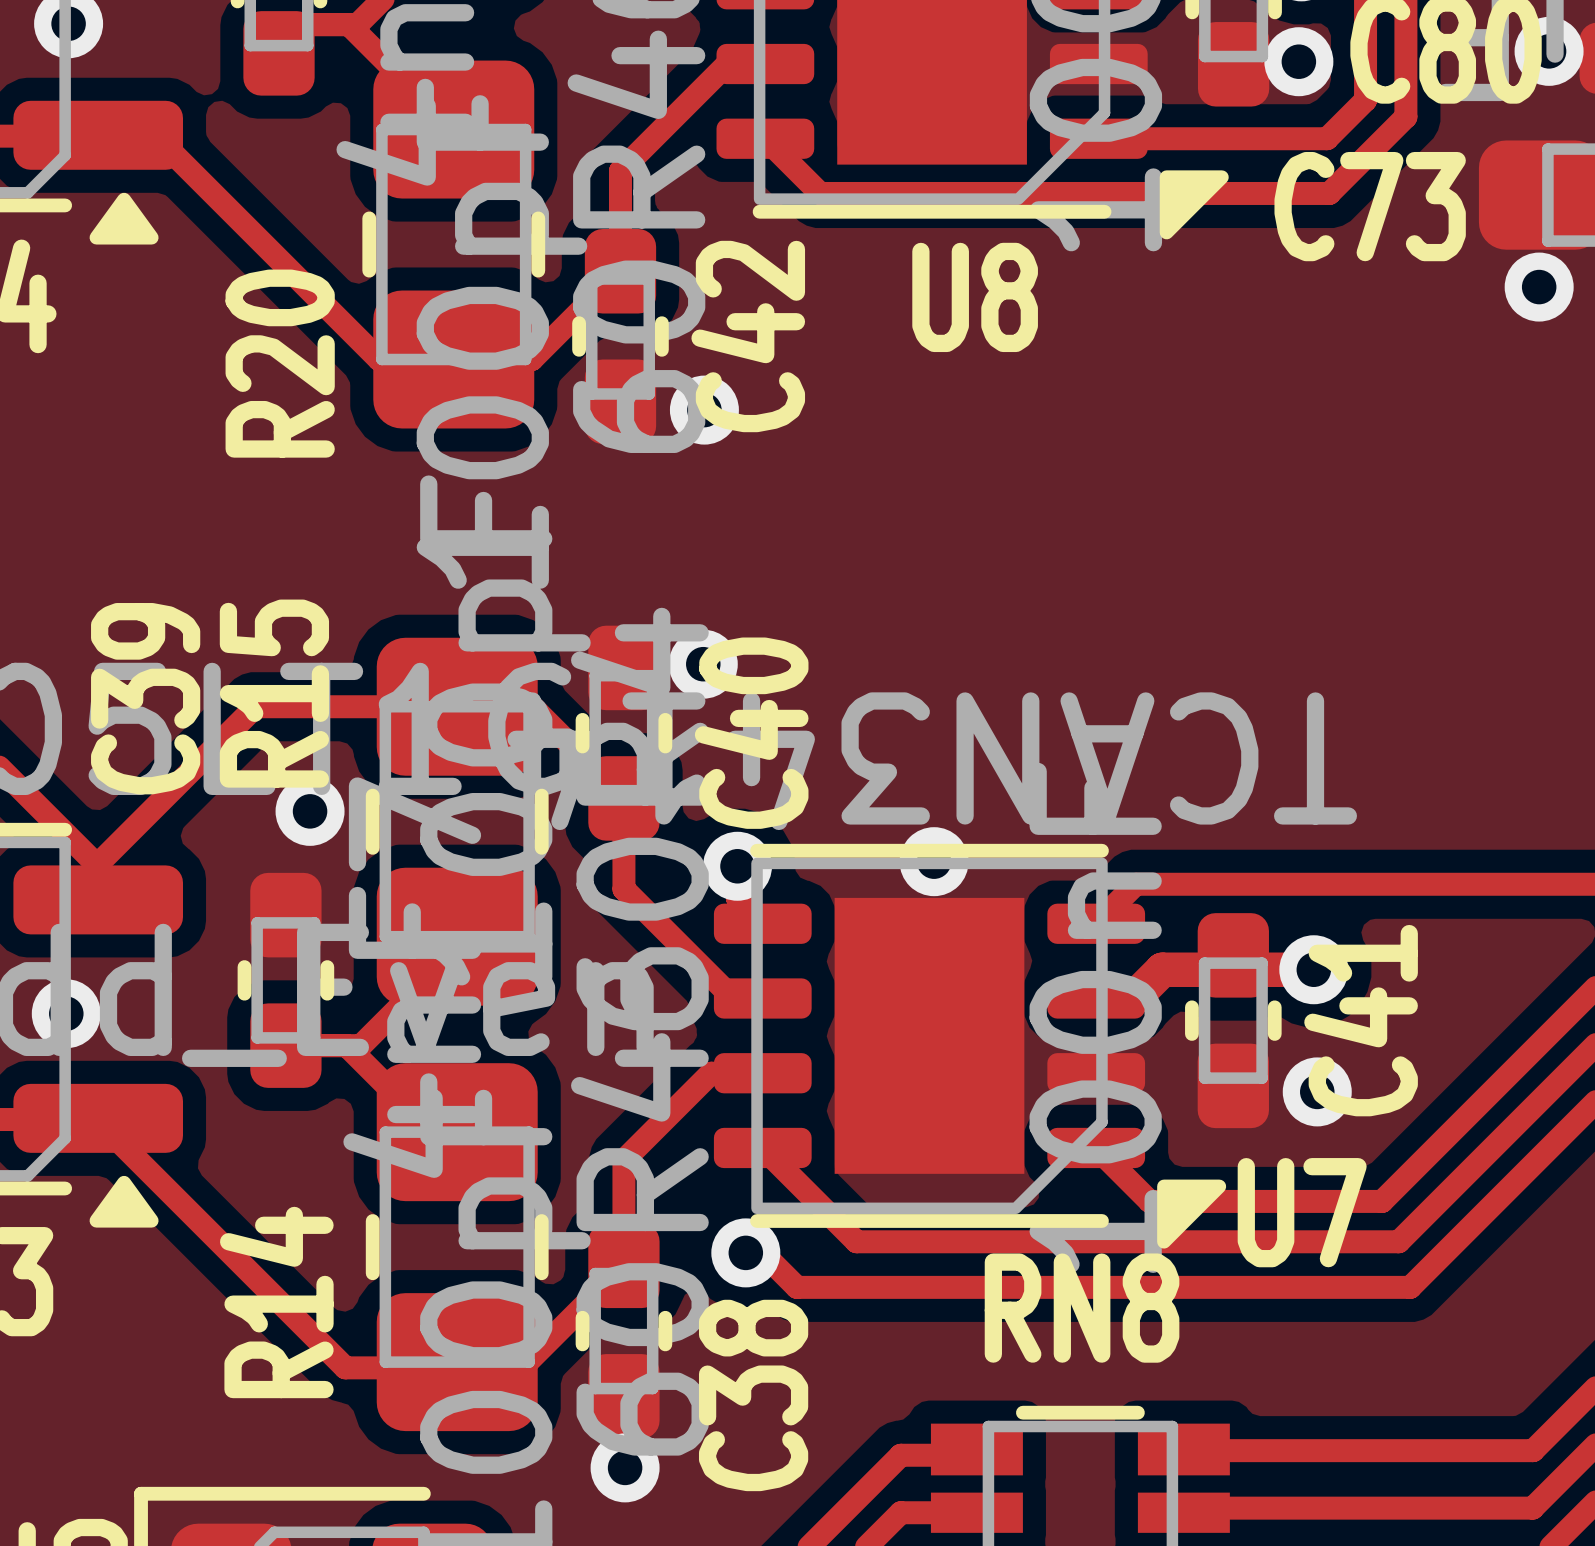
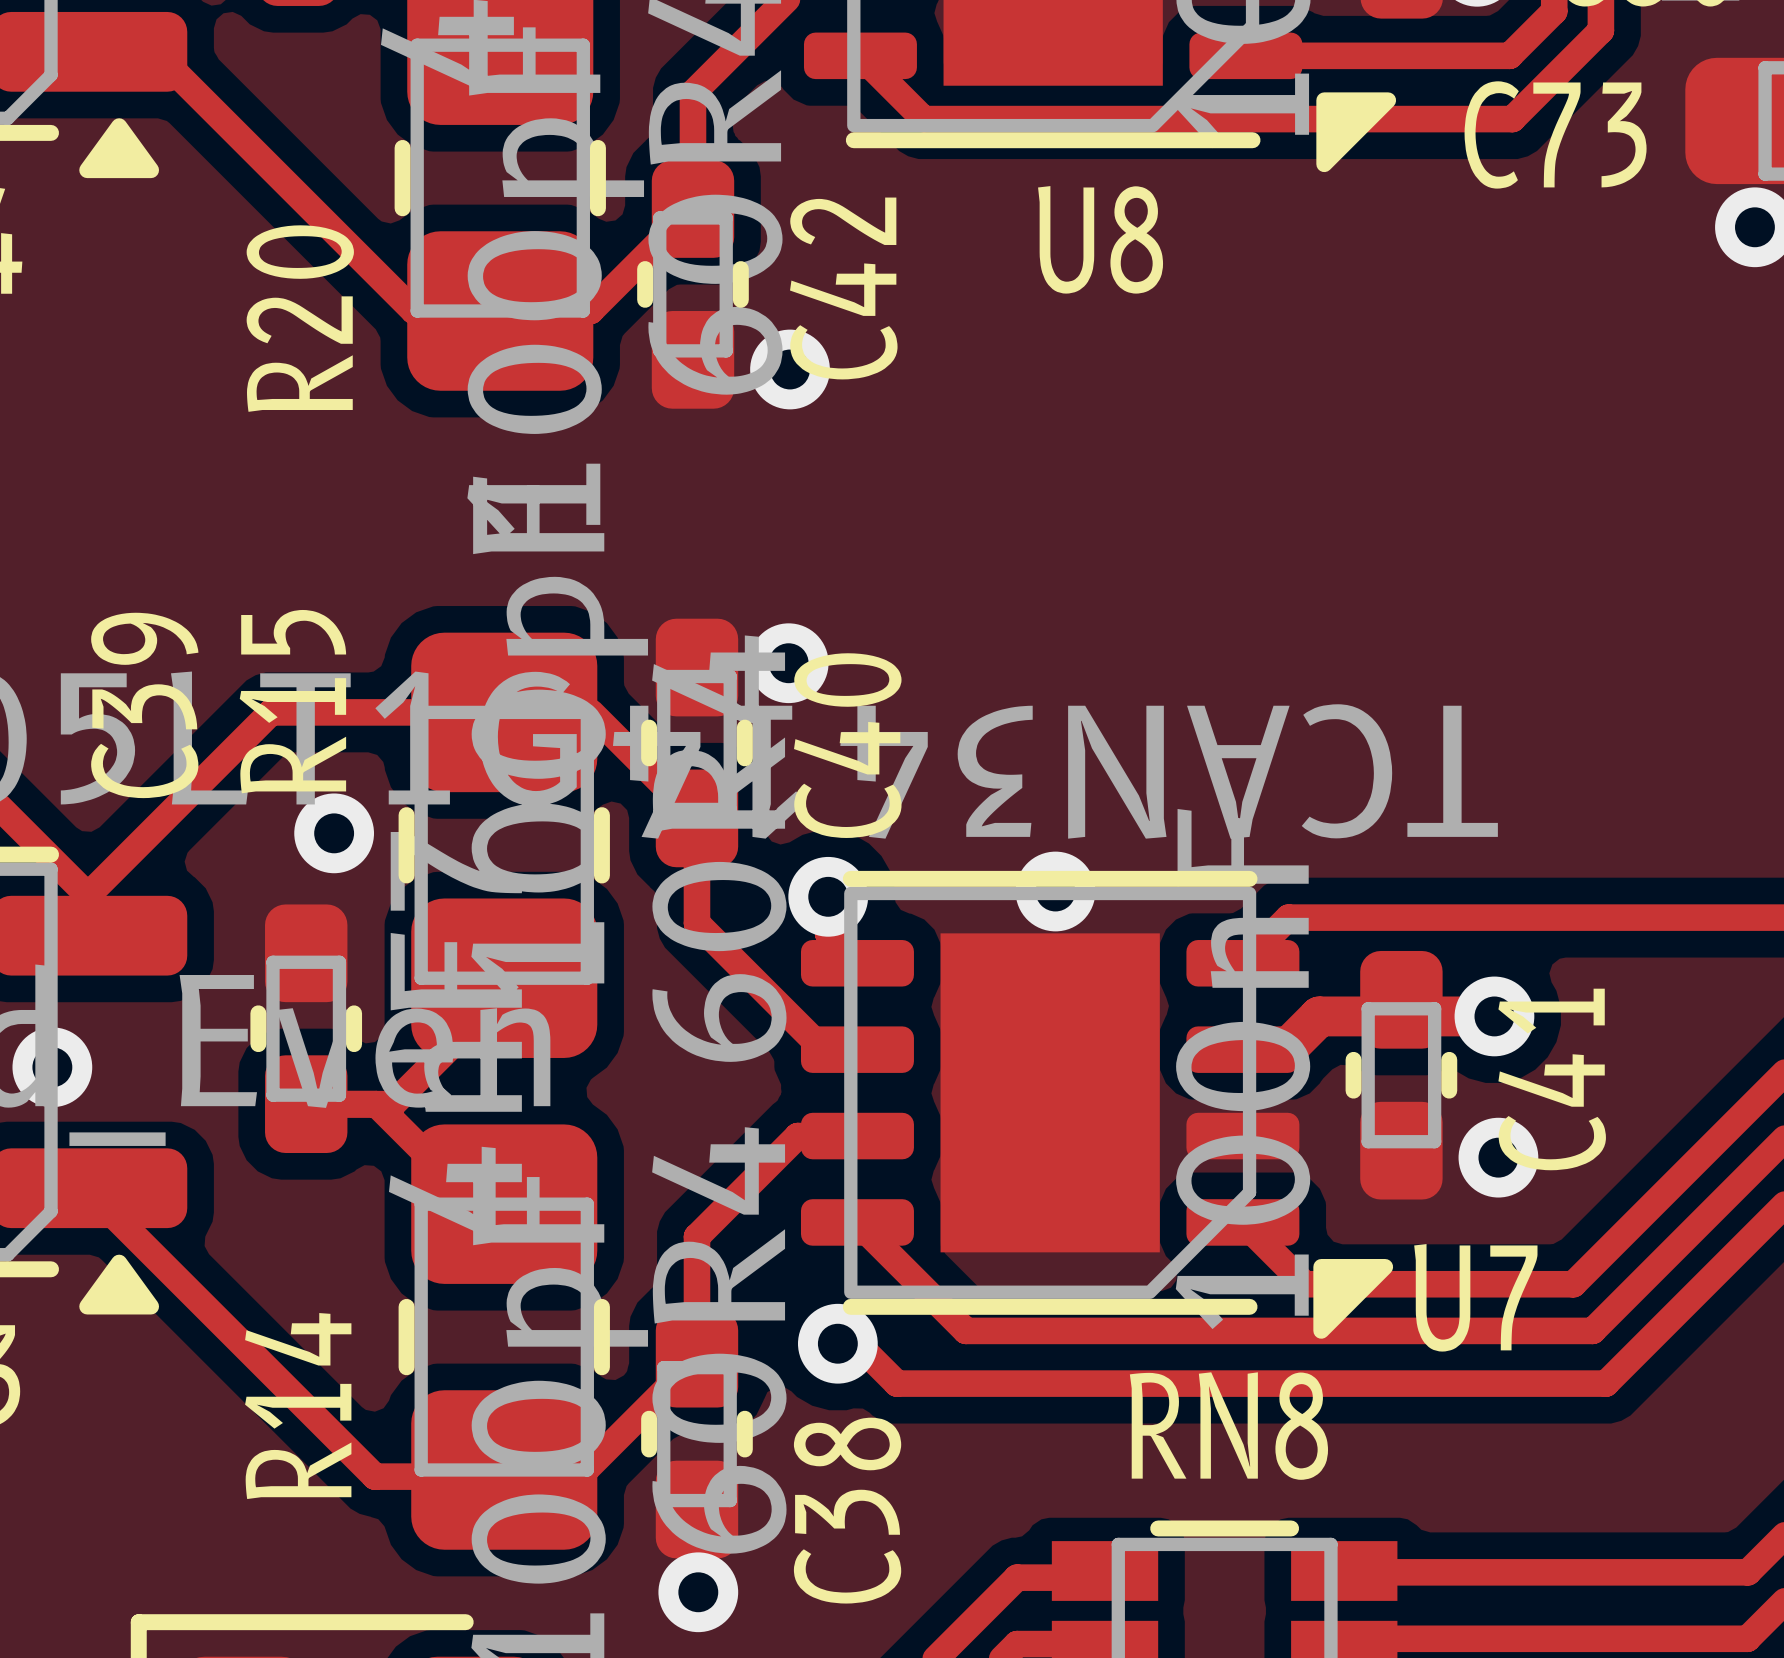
RN8 name position: RN8 (1082, 1308) -> RN8 (1228, 1426)

